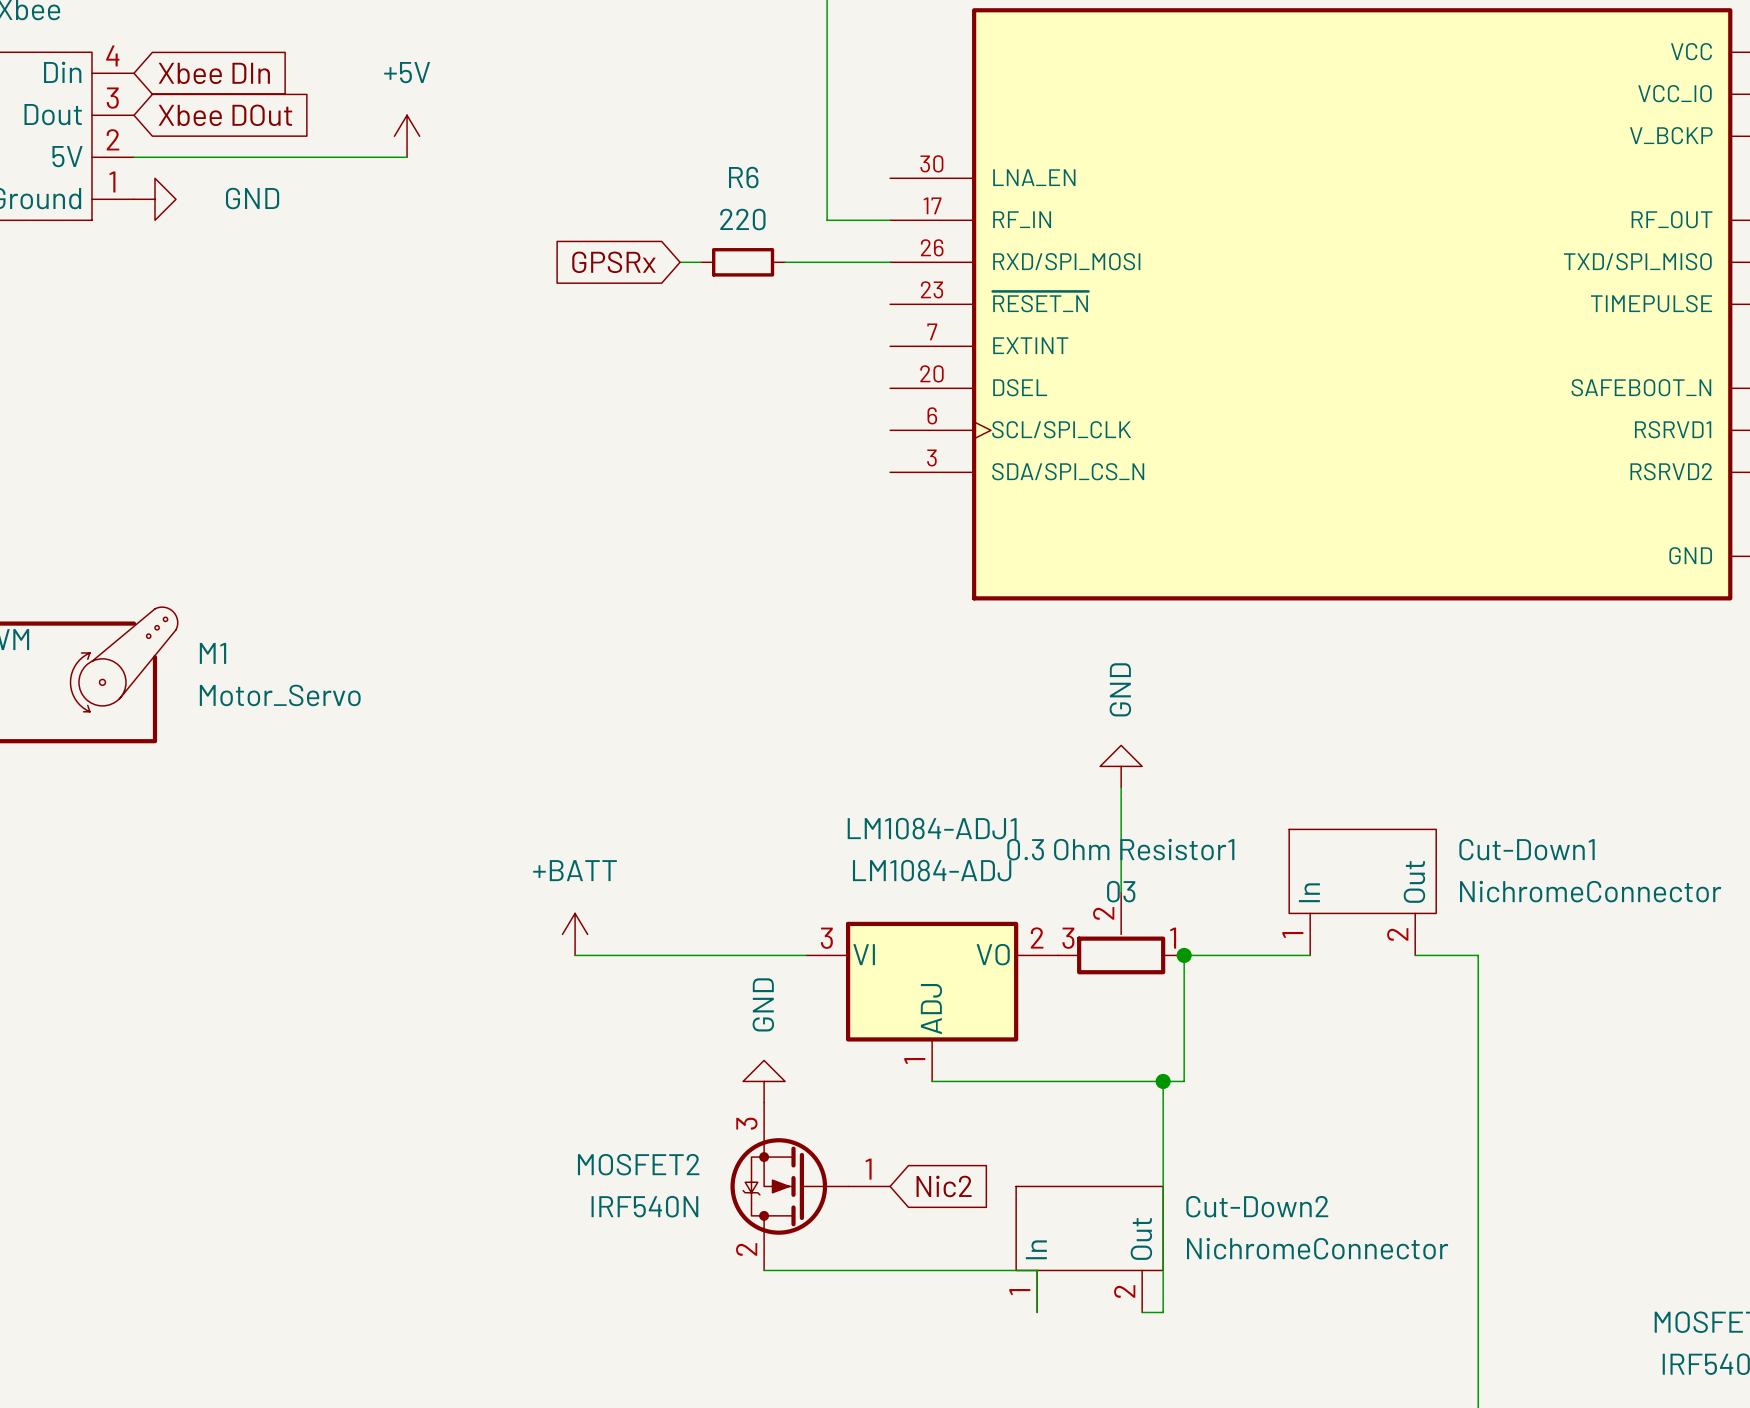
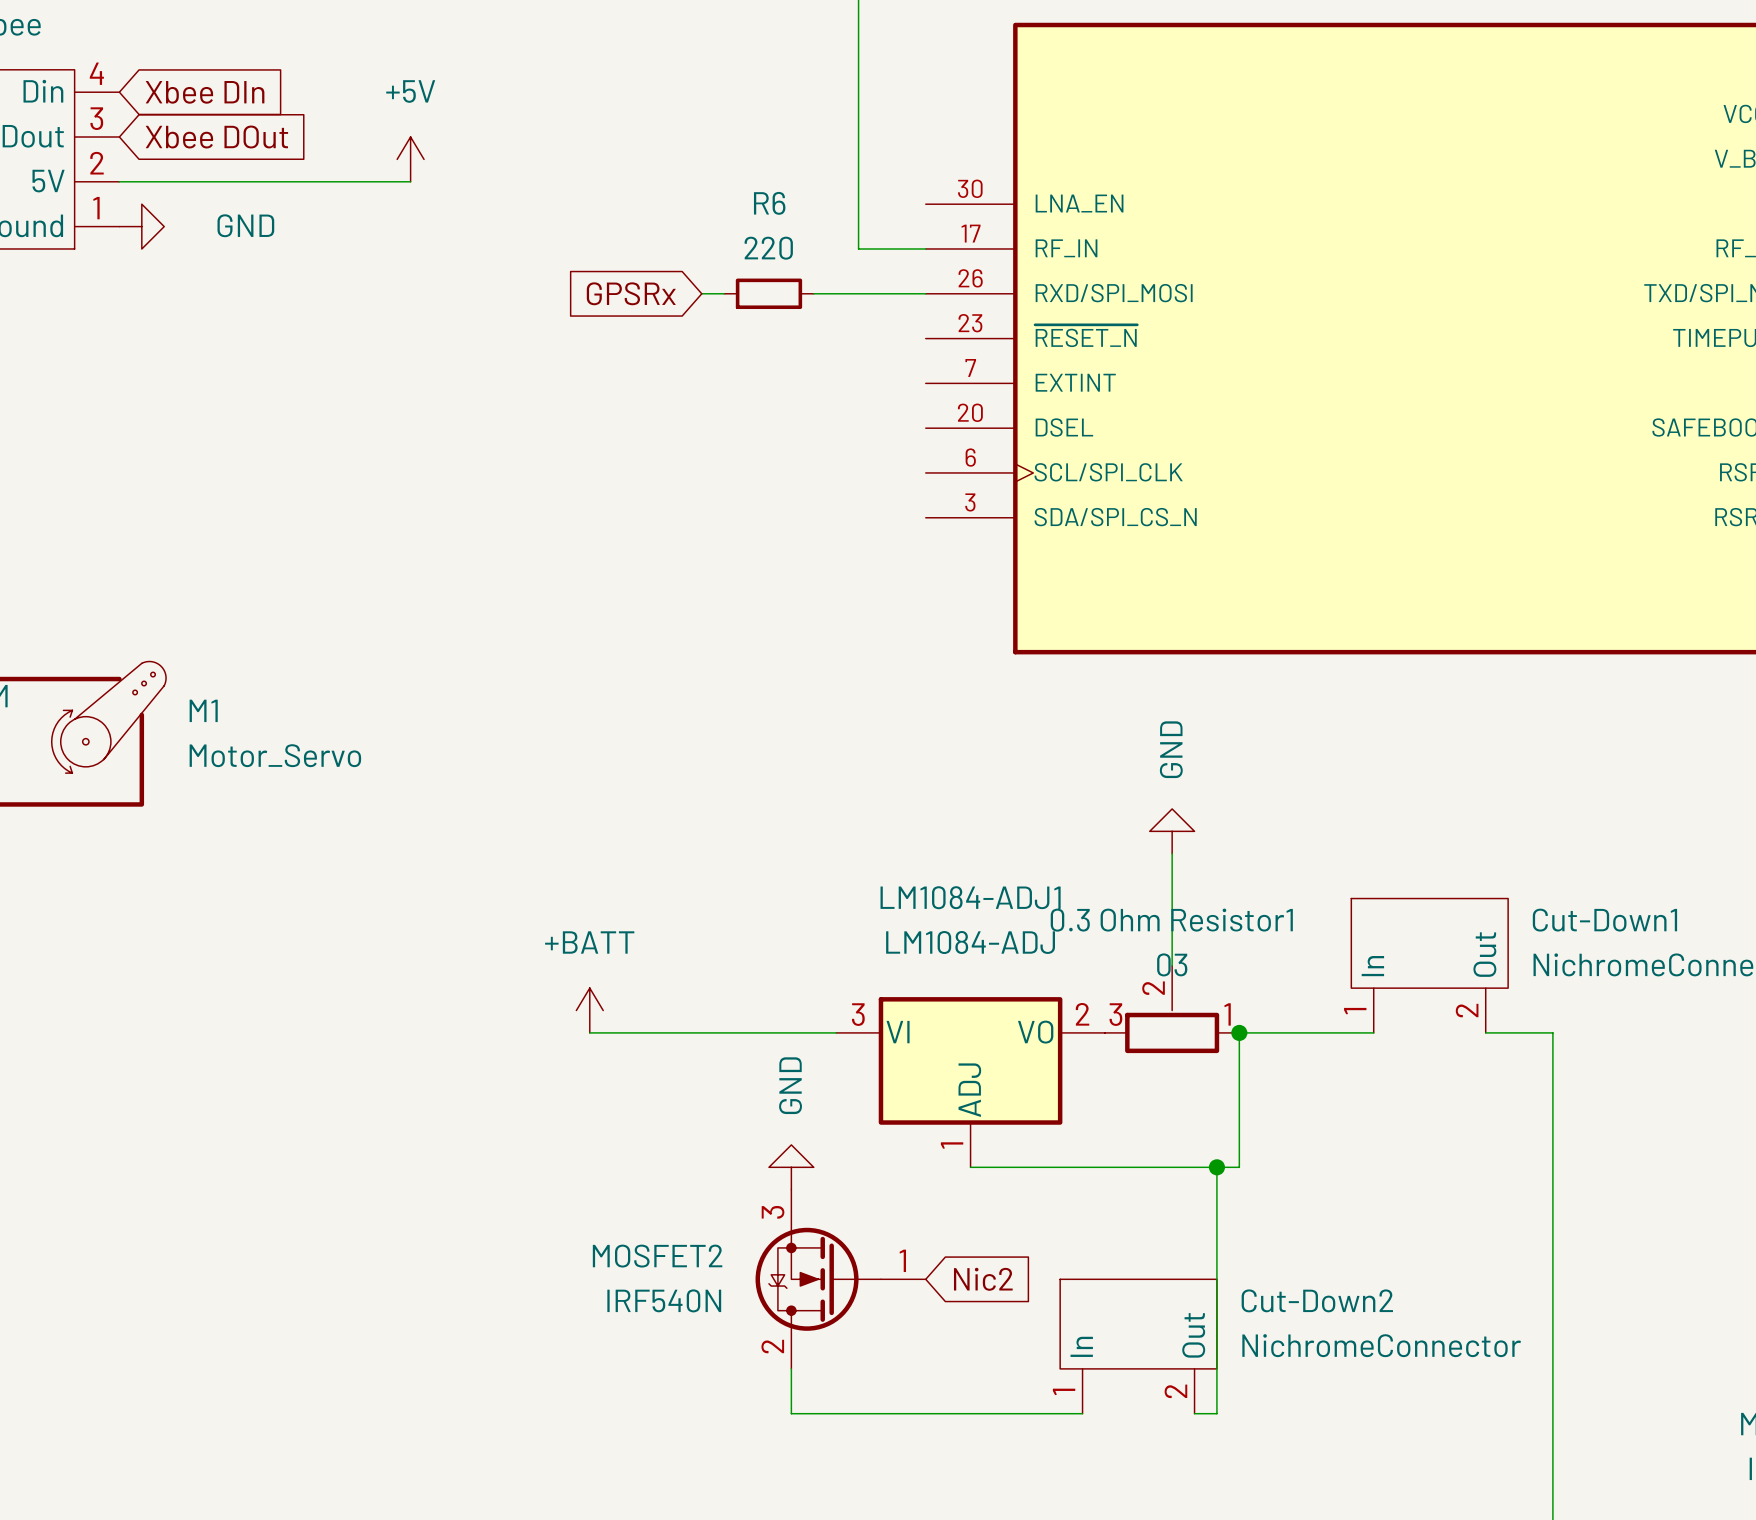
wire: (764, 1270) (1037, 1270) (1037, 1312) -> (791, 1368) (791, 1413) (1082, 1413)

